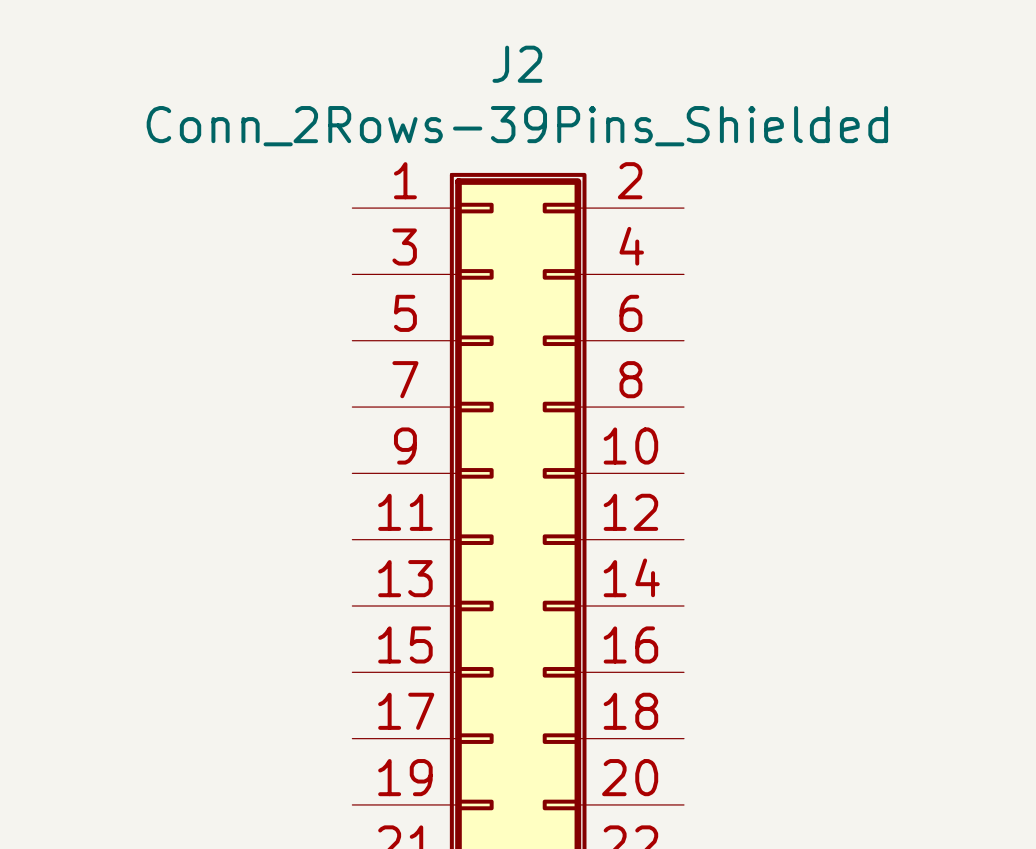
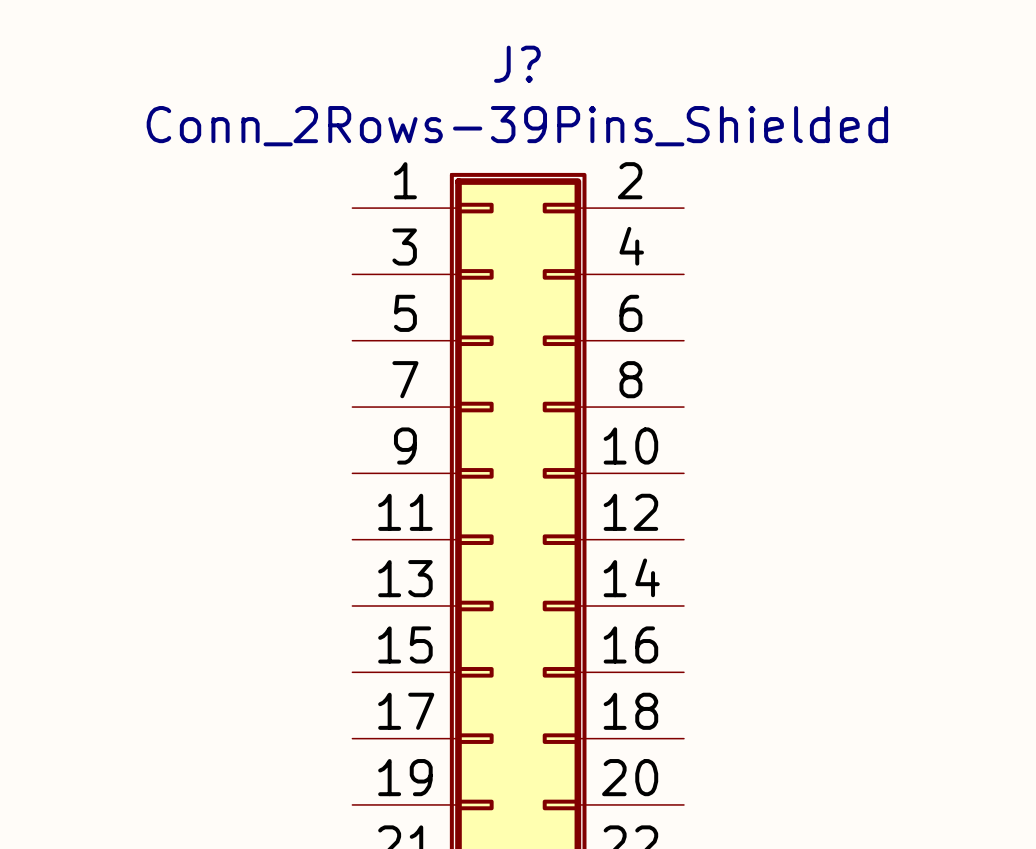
J2 name: J2 (517, 64) -> J? (517, 64)

